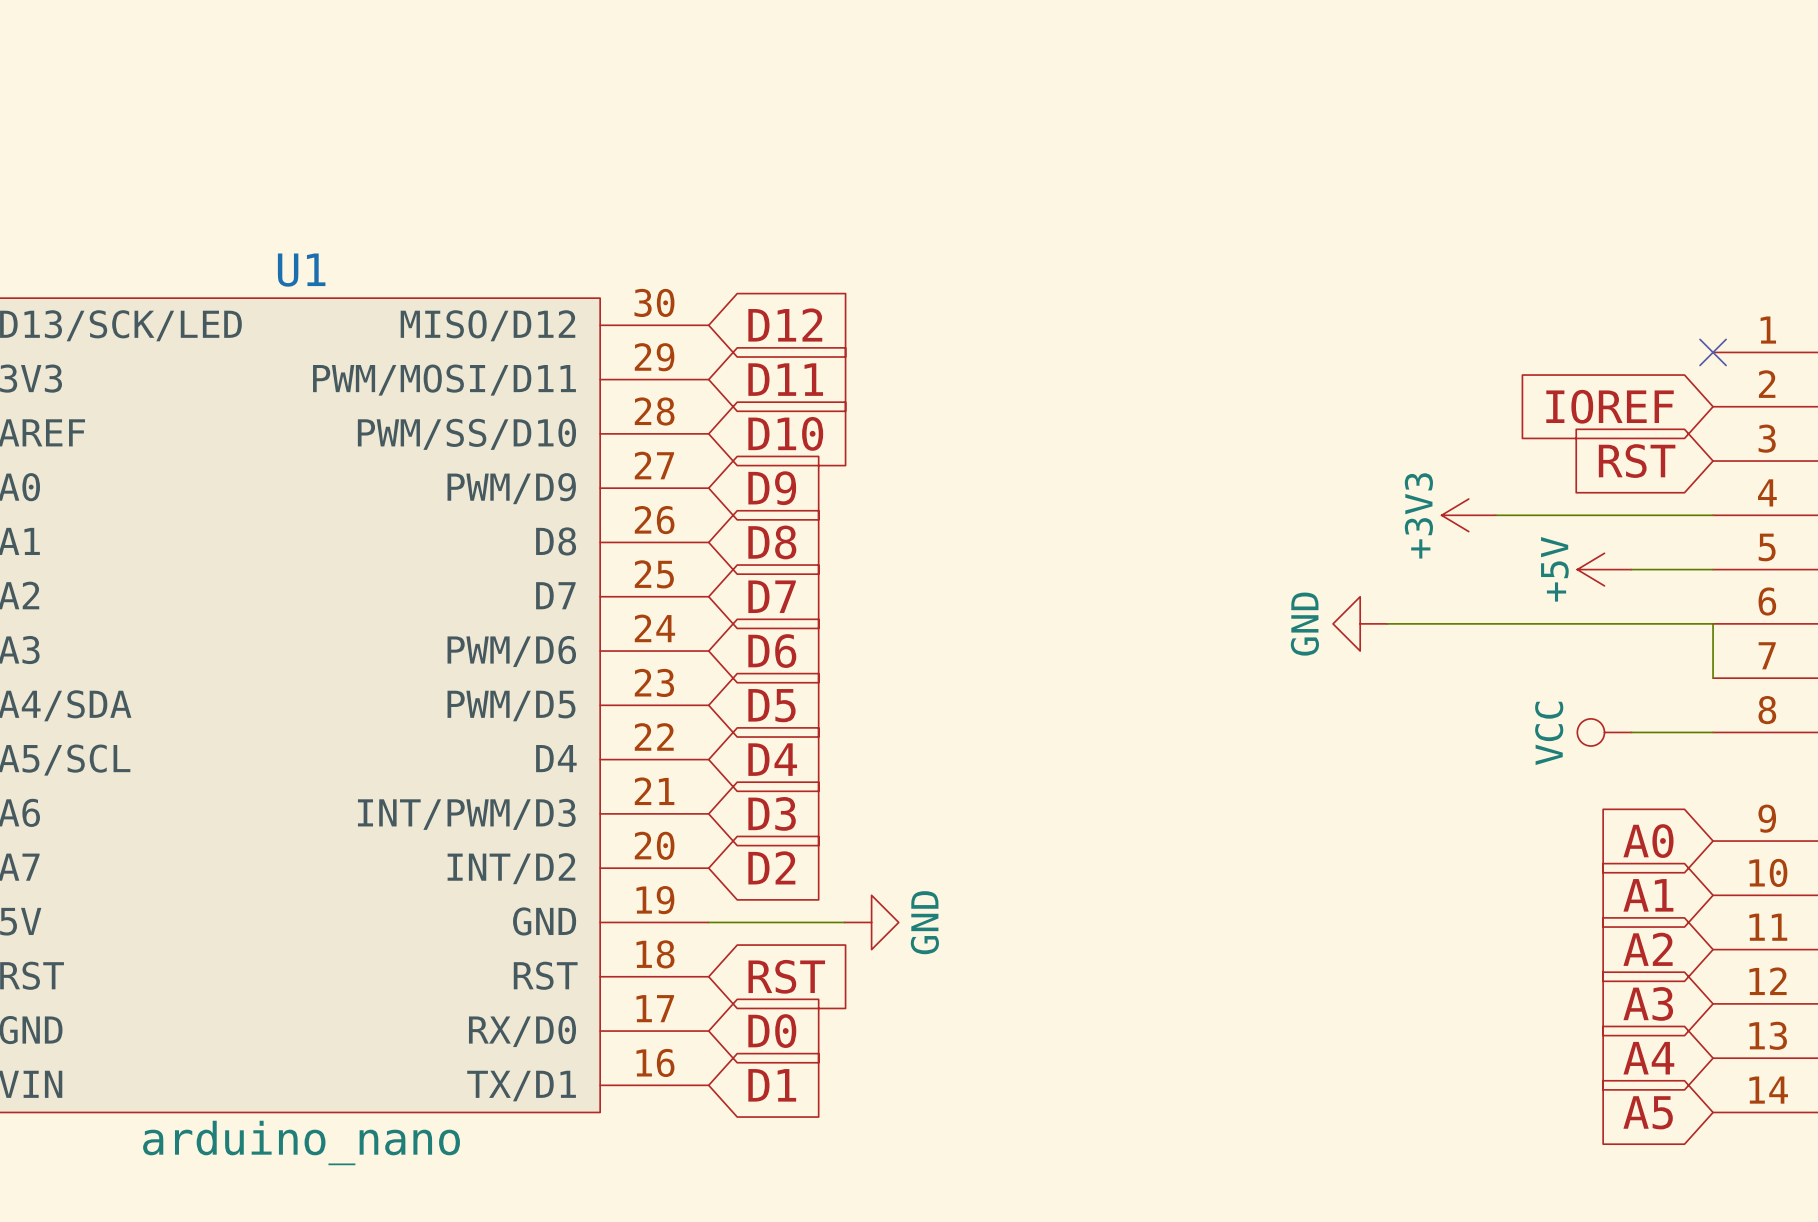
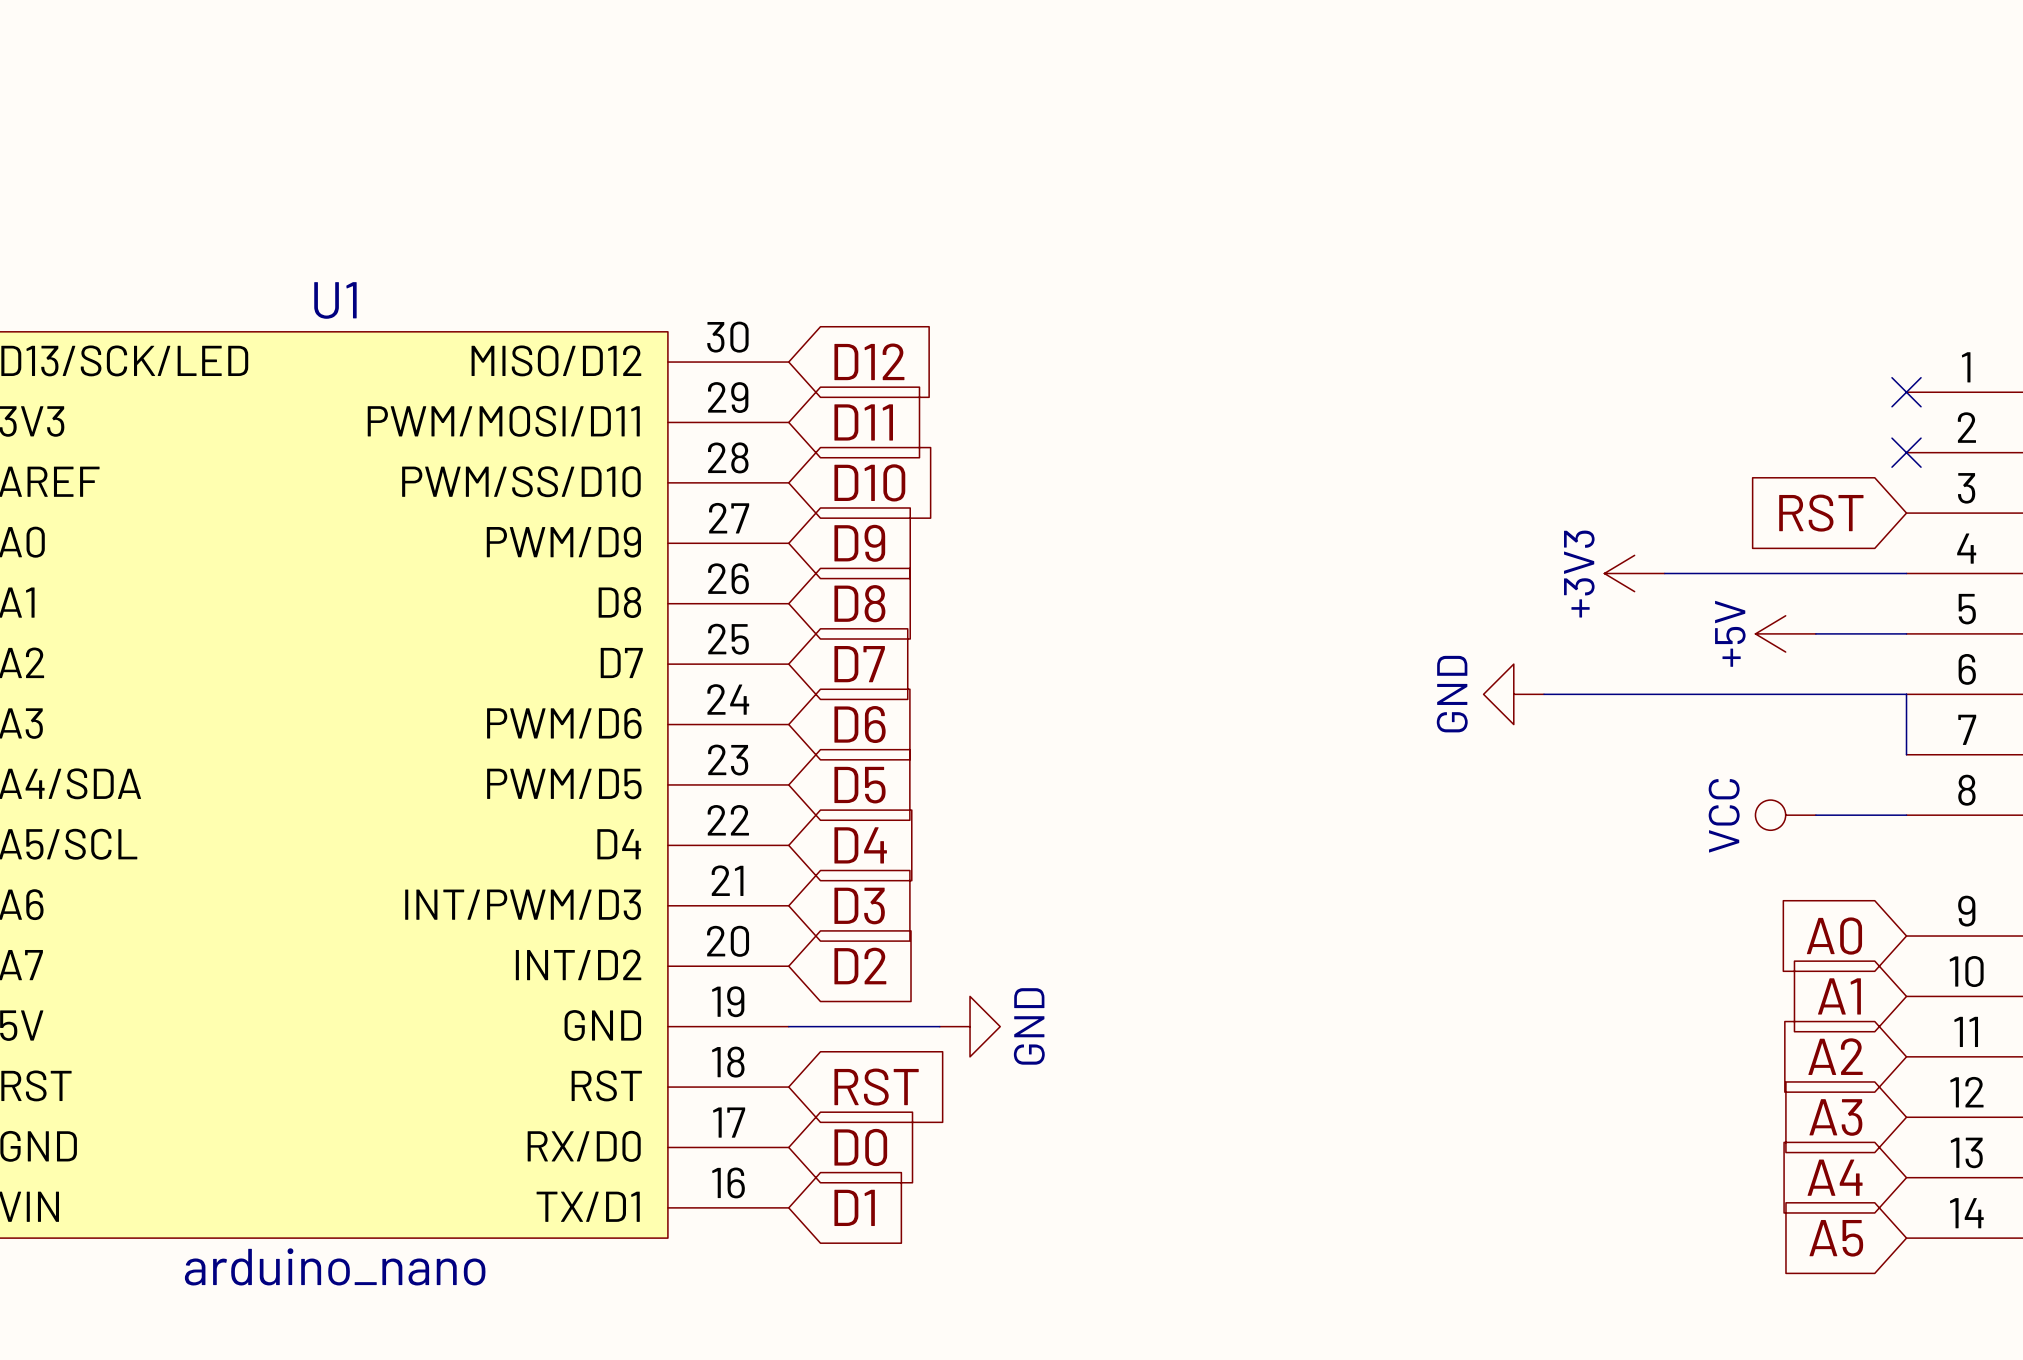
global label: IOREF (1610, 406) -> none
no-connect mark: none -> (1906, 452)

